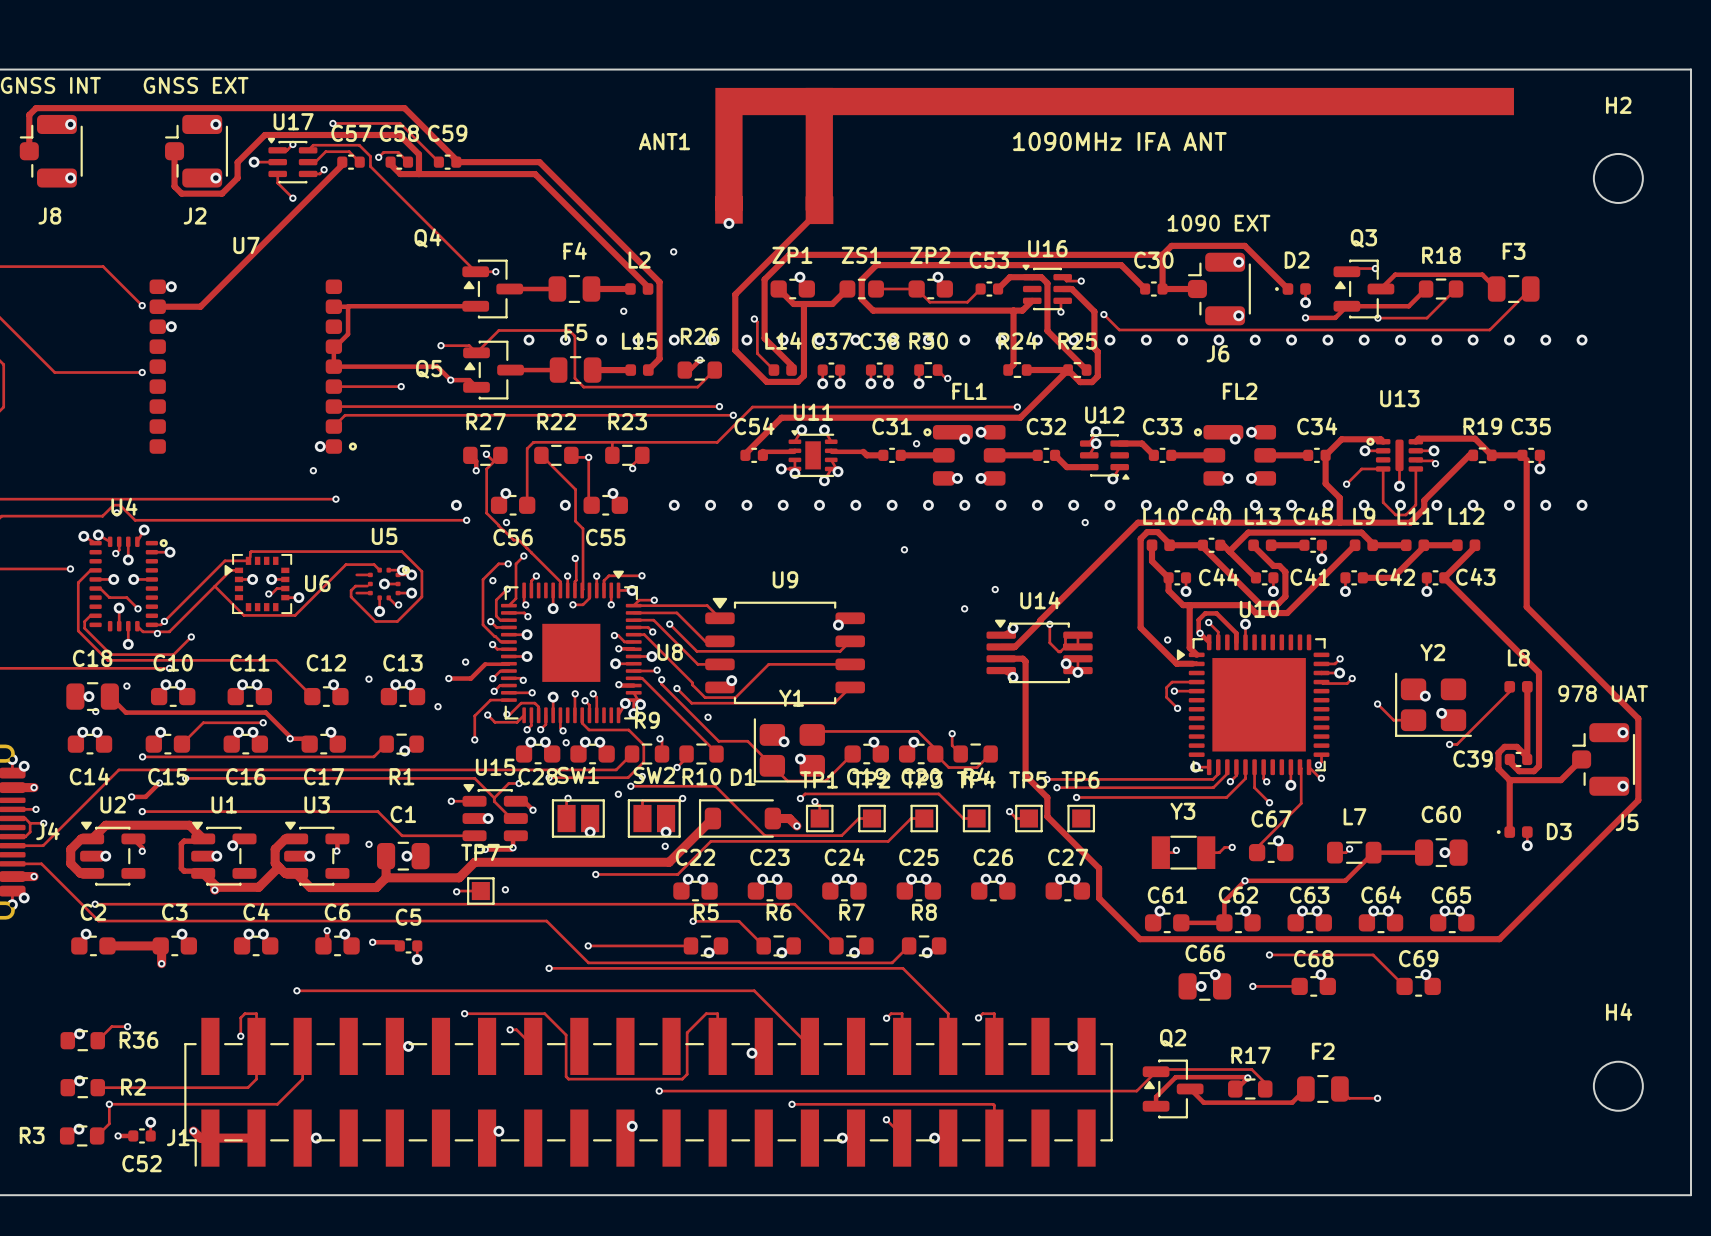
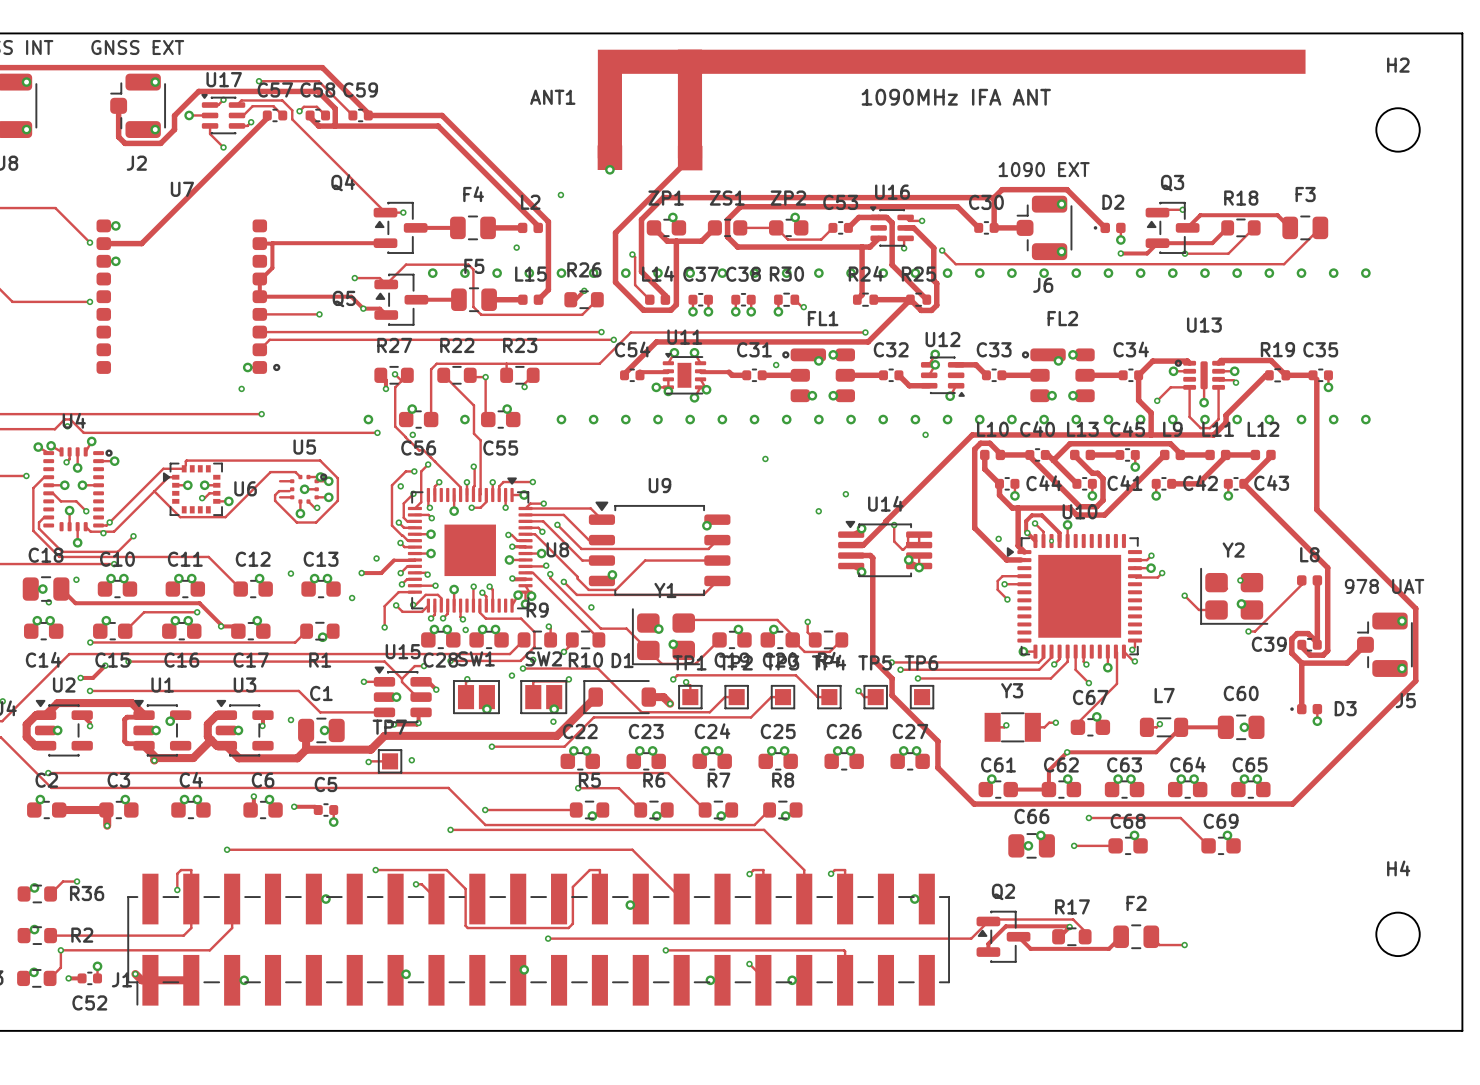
via: none -> (1051, 541)
via: none -> (1240, 580)
via: (1425, 696) -> none

